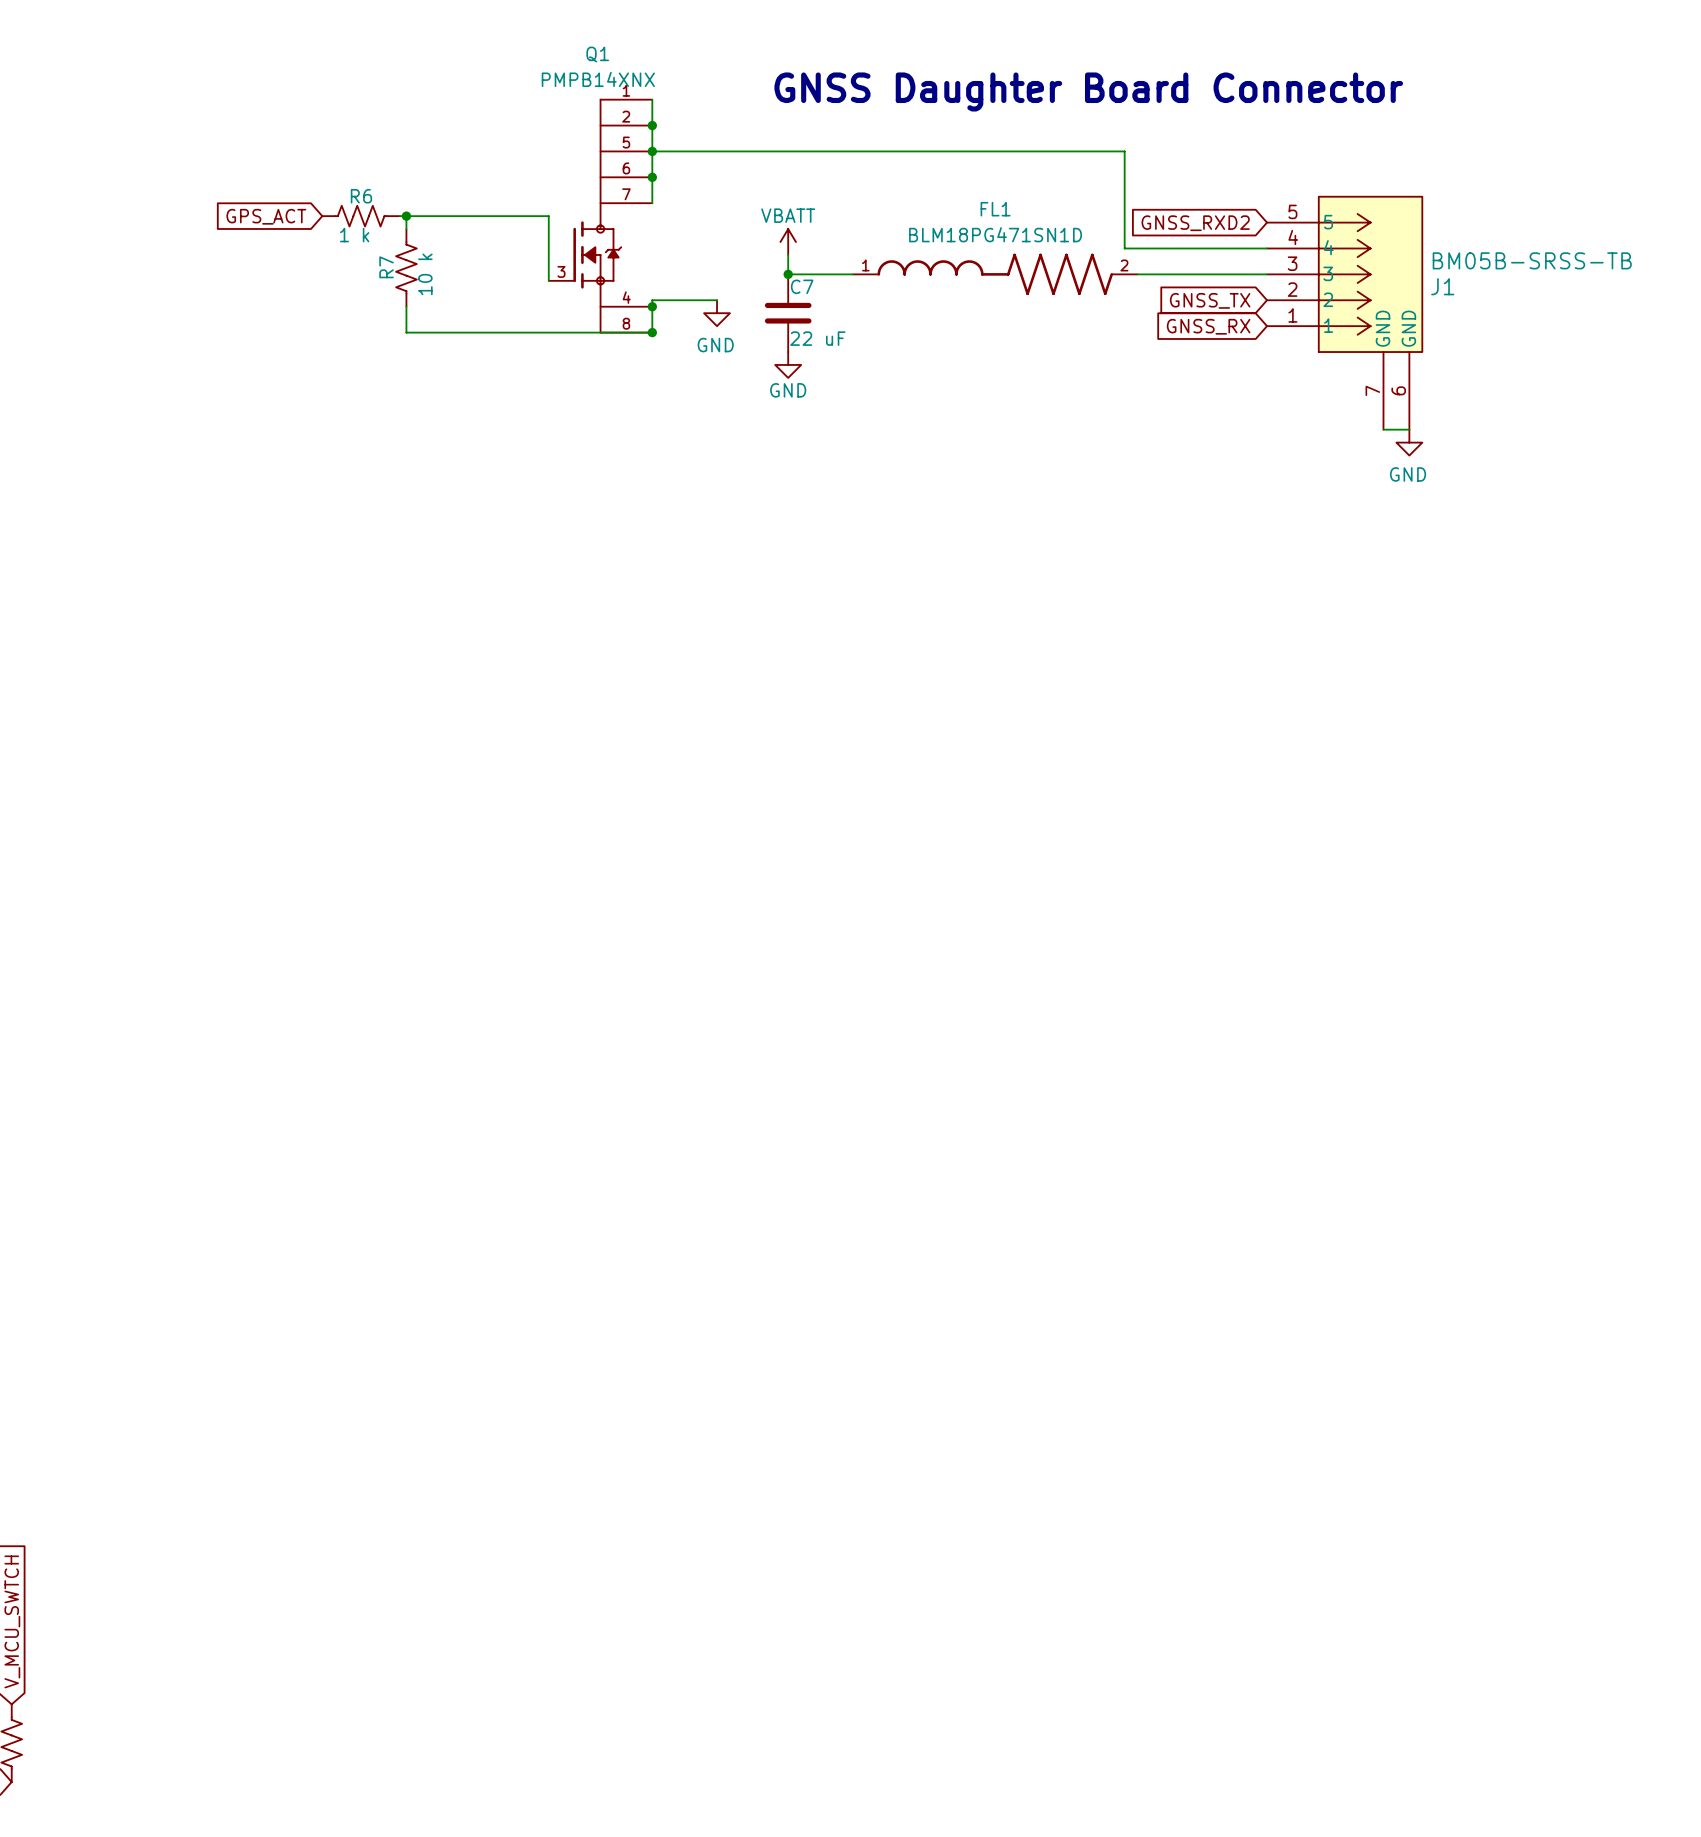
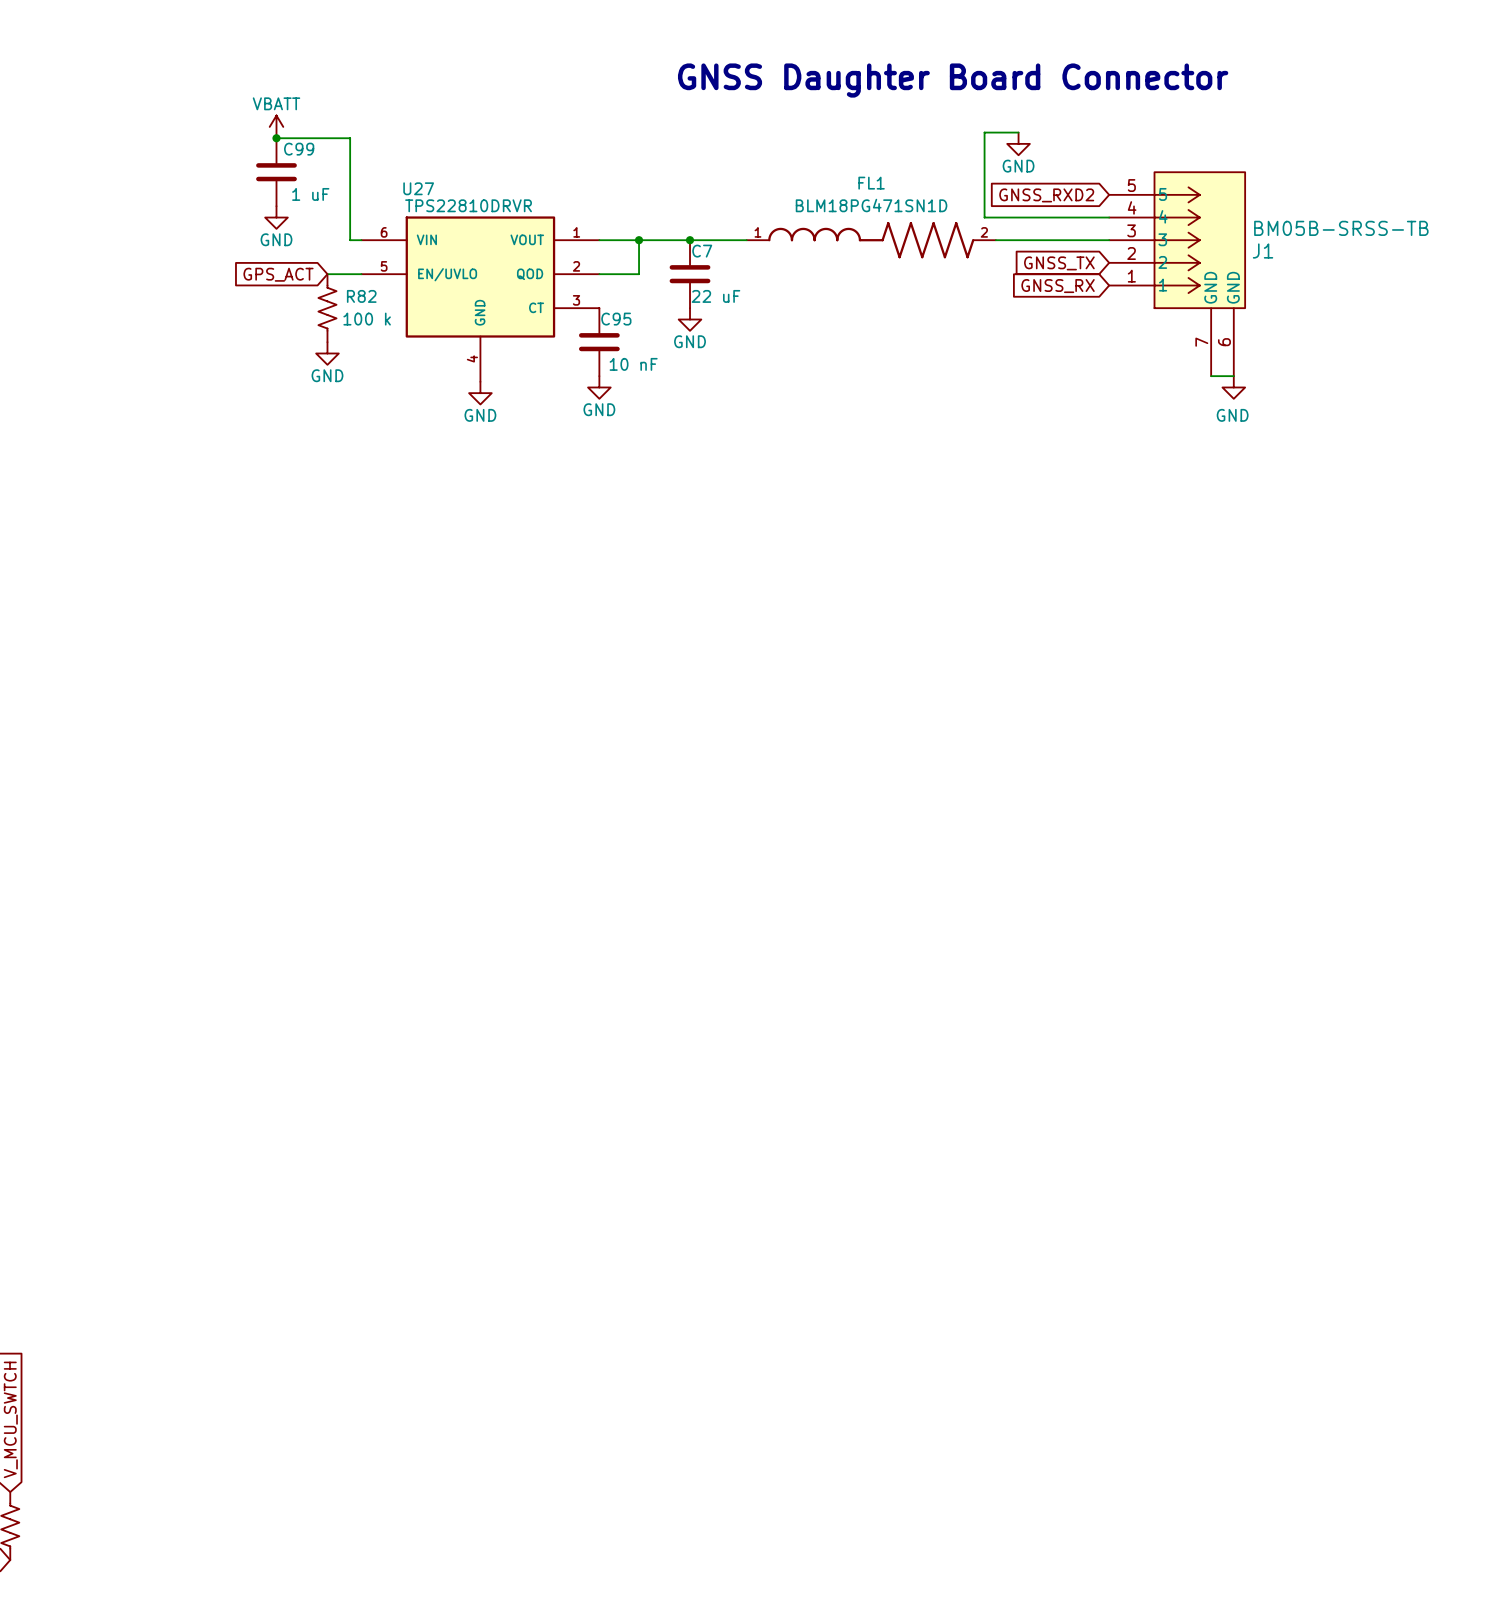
wire: (652, 99) (652, 203) -> none
junction: (652, 125) -> none
power symbol: none -> VBATT (276, 126)
wire: (652, 151) (1124, 151) -> (1018, 132) (984, 132)
junction: (652, 151) -> none
wire: none -> (276, 138) (350, 138) (350, 240) (361, 240)
junction: none -> (276, 138)
power symbol: none -> GND (1018, 143)
junction: (652, 177) -> none
C99: none -> 1 uF (276, 172)
global label position: GPS_ACT (266, 216) -> GPS_ACT (278, 274)
R6: 1 k (361, 216) -> none
wire: (399, 216) (548, 216) (548, 280) -> none
wire: (406, 216) (406, 229) -> none
junction: (406, 216) -> none
Q1: PMPB14XNX (600, 216) -> none
power symbol: VBATT (788, 242) -> none
power symbol: none -> GND (276, 217)
wire: (788, 254) (788, 274) -> (599, 240) (690, 240)
R7: 10 k (406, 267) -> none
wire: none -> (639, 240) (639, 274) (599, 274)
junction: none -> (639, 240)
wire: (717, 300) (652, 300) (652, 332) (406, 332) (406, 306) -> none
junction: (652, 306) -> none
wire: none -> (327, 274) (361, 274)
power symbol: GND (717, 313) -> none
junction: (652, 332) -> none
U27: none -> TPS22810DRVR (480, 299)
R82: none -> 100 k (327, 308)
C95: none -> 10 nF (599, 342)
power symbol: none -> GND (327, 353)
power symbol: none -> GND (599, 387)
power symbol: none -> GND (480, 393)

